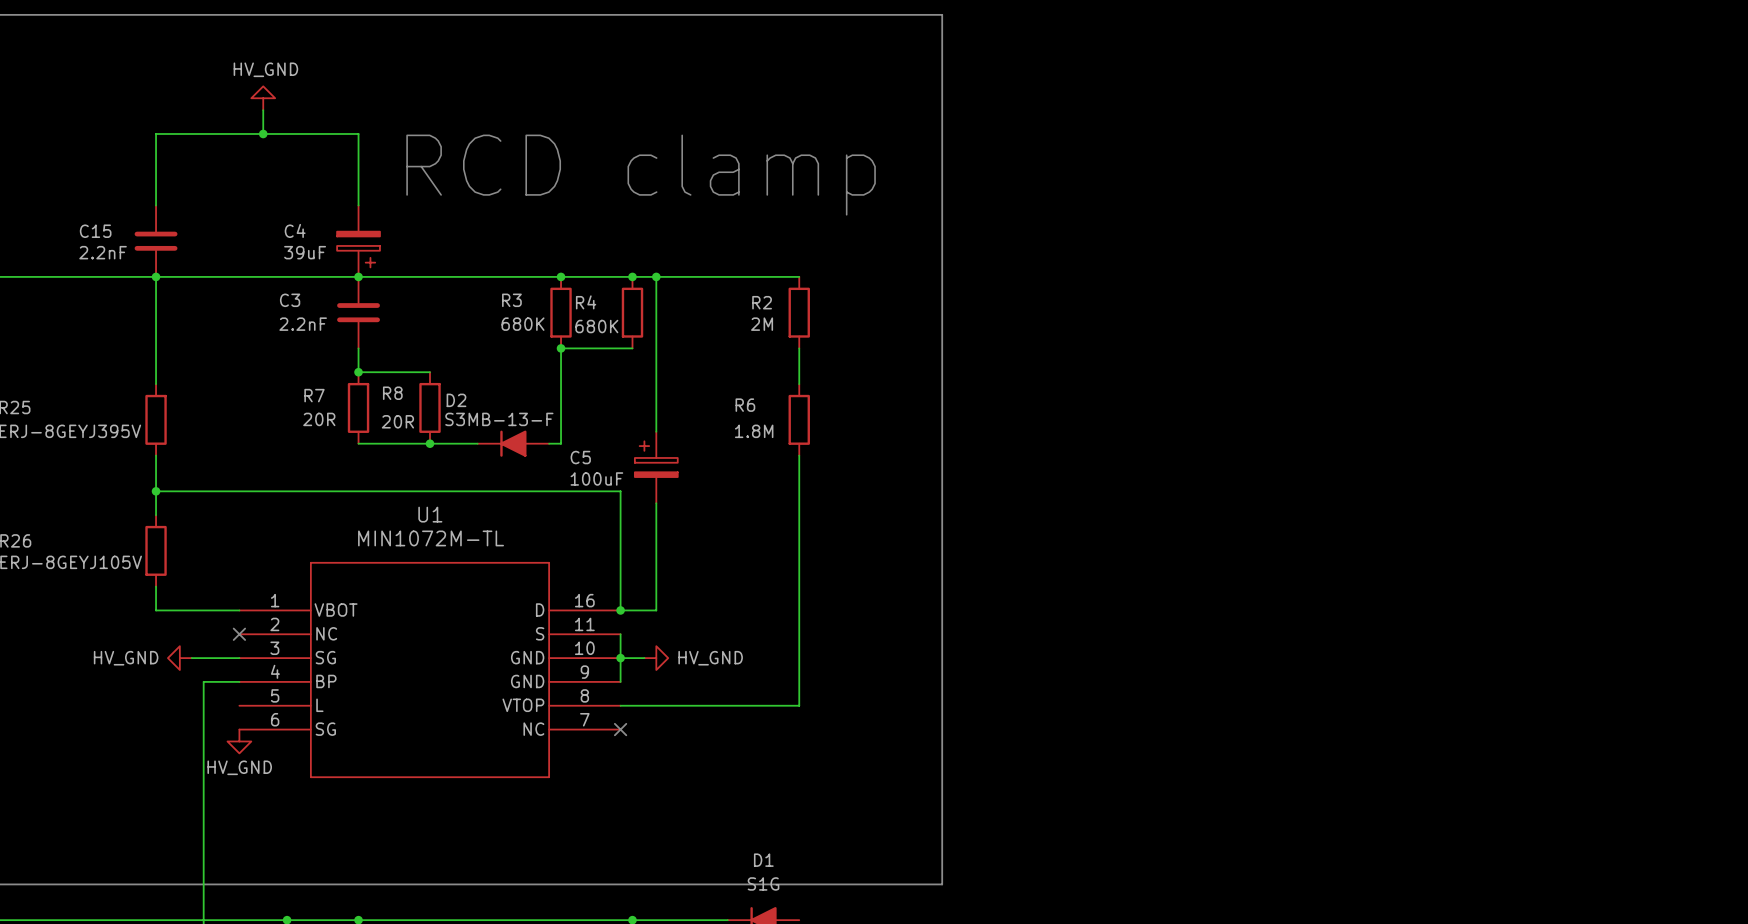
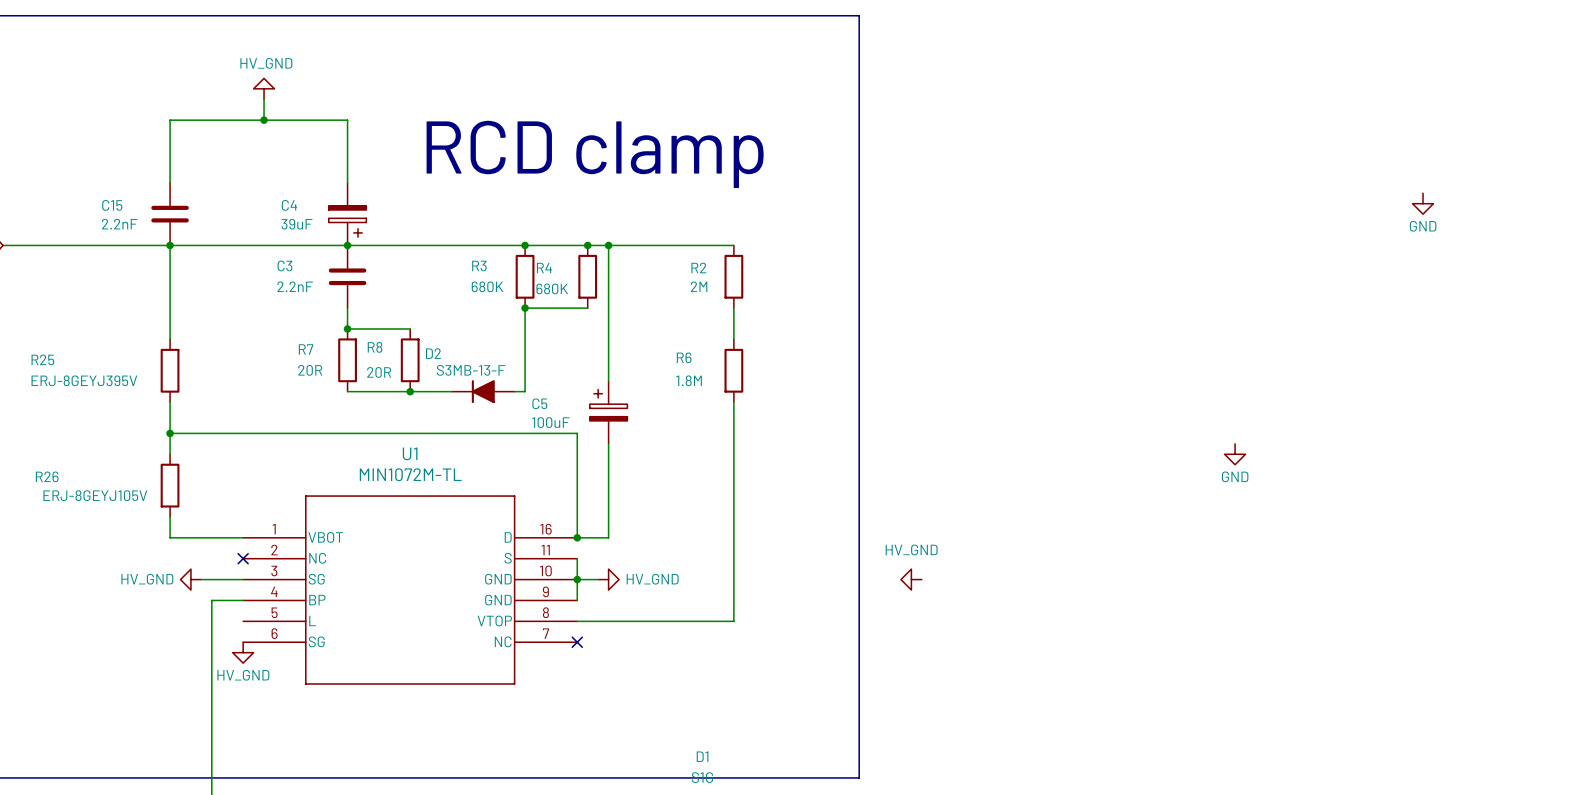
power symbol: none -> GND (1423, 203)
power symbol: none -> GND (1235, 454)
power symbol: none -> HV_GND (911, 579)

